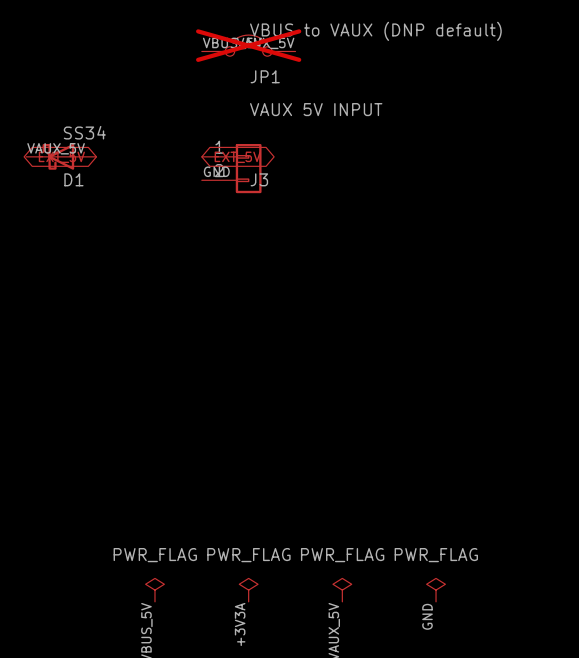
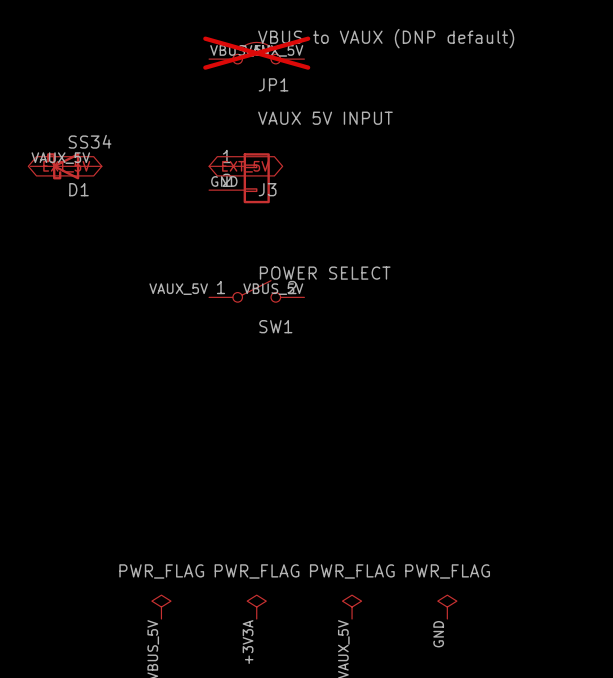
label: none -> VAUX_5V (178, 289)
label: none -> VBUS_5V (273, 289)
SW1: none -> POWER SELECT (256, 291)

